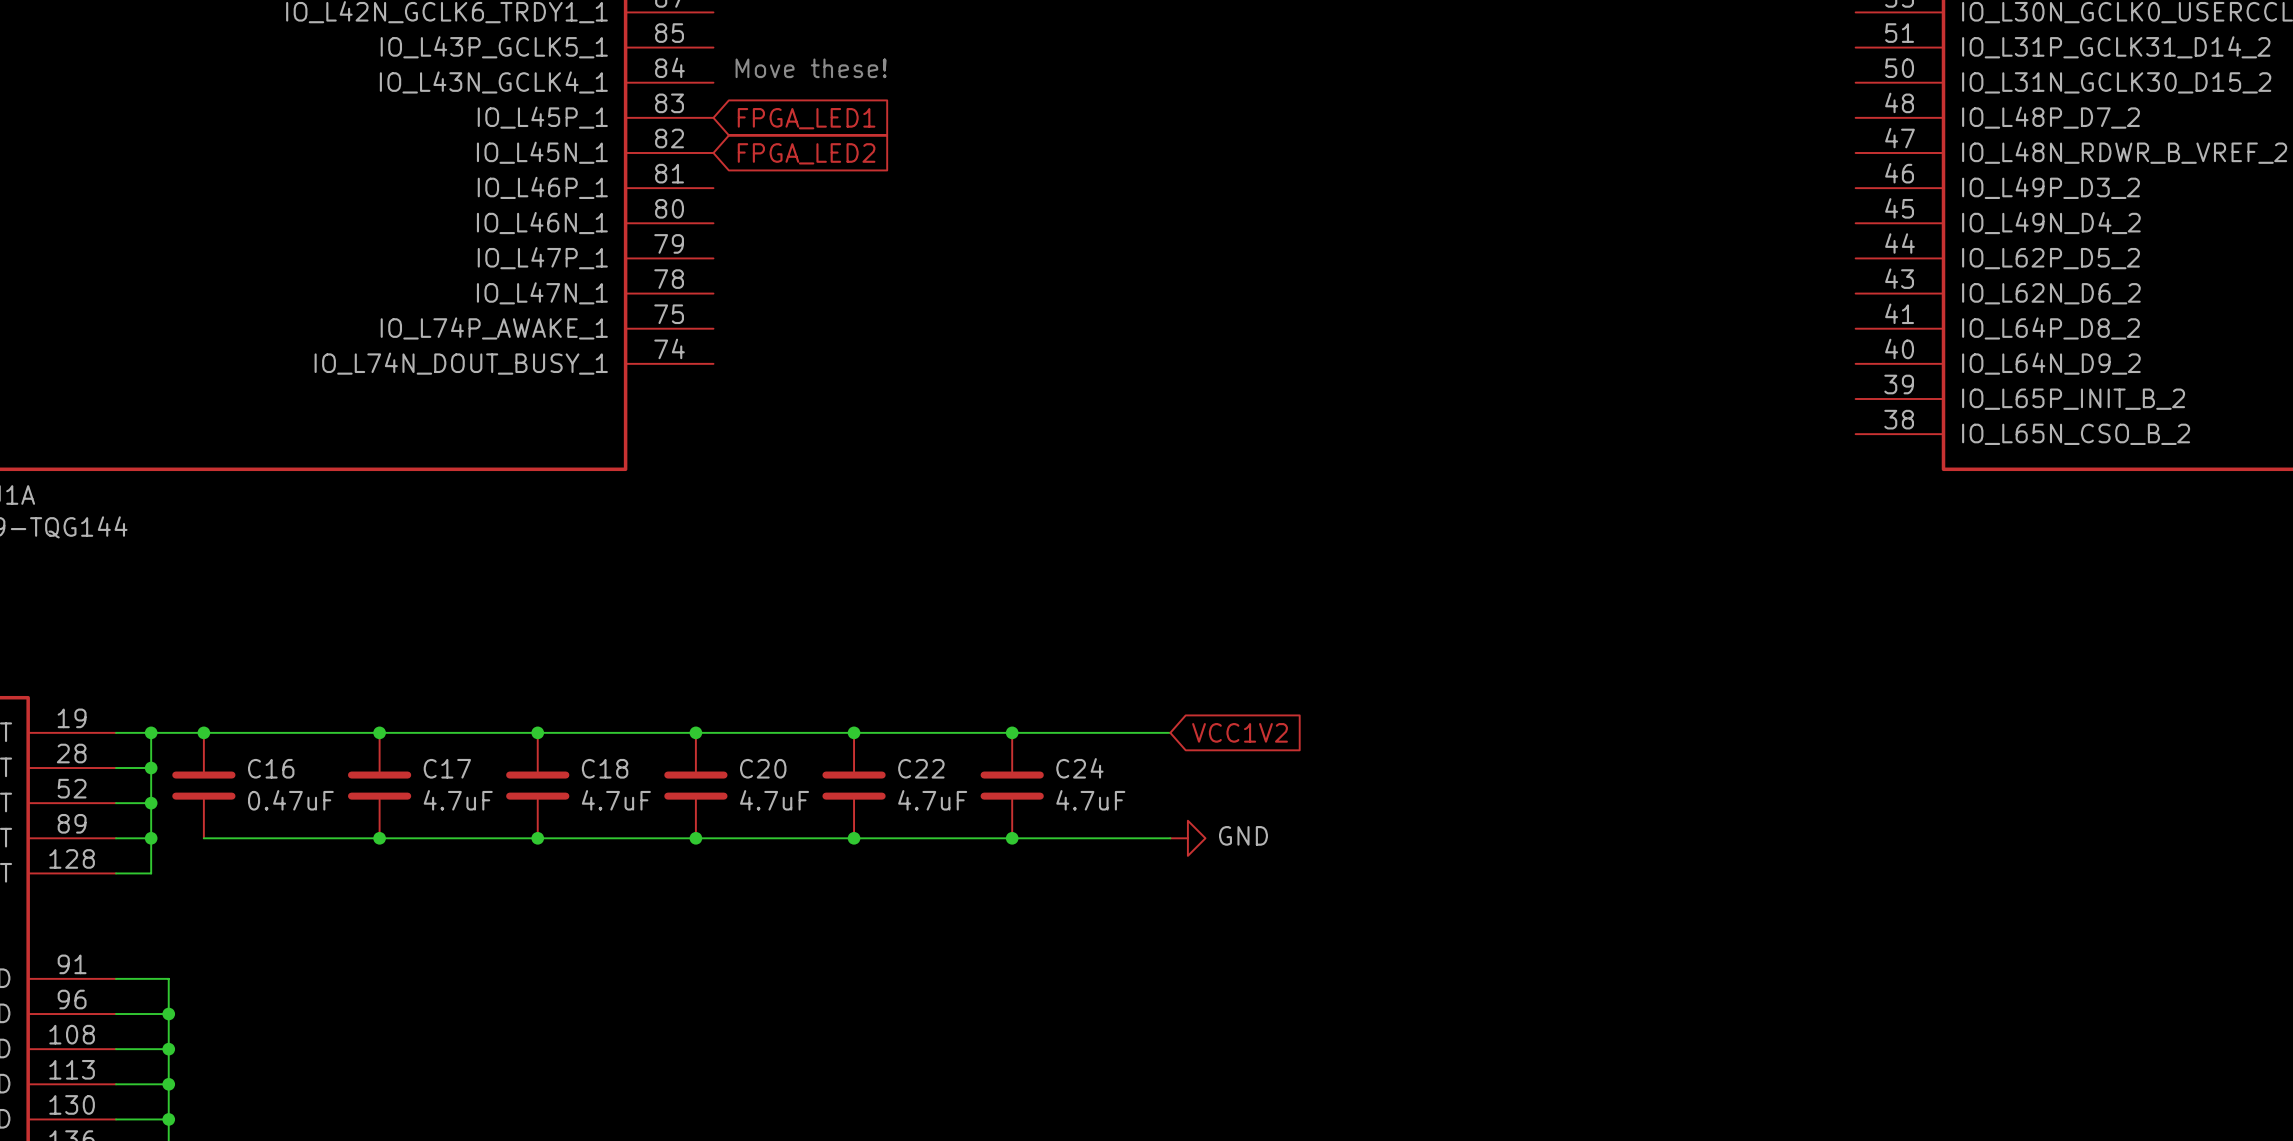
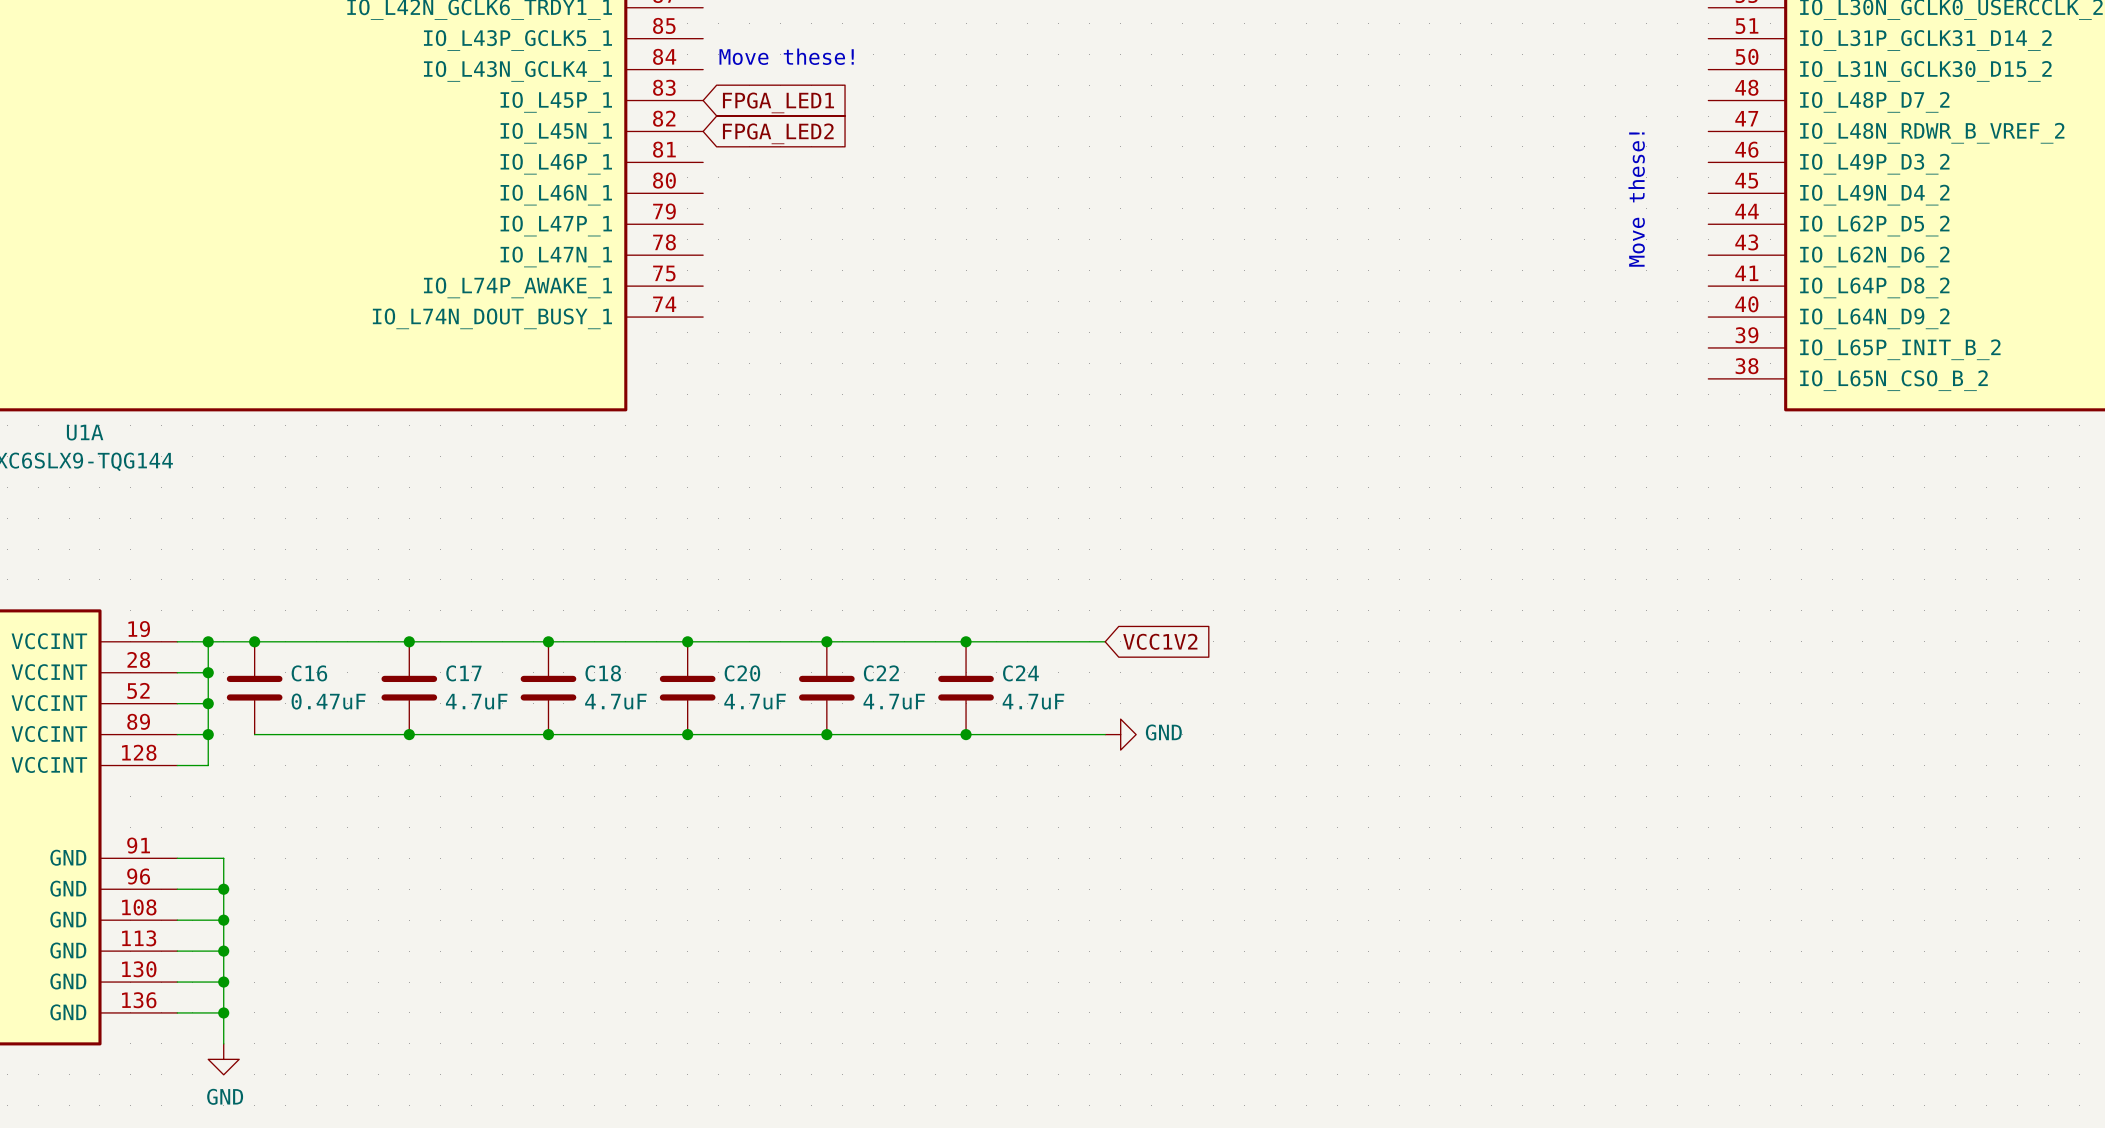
text: none -> Move these! (1636, 199)

